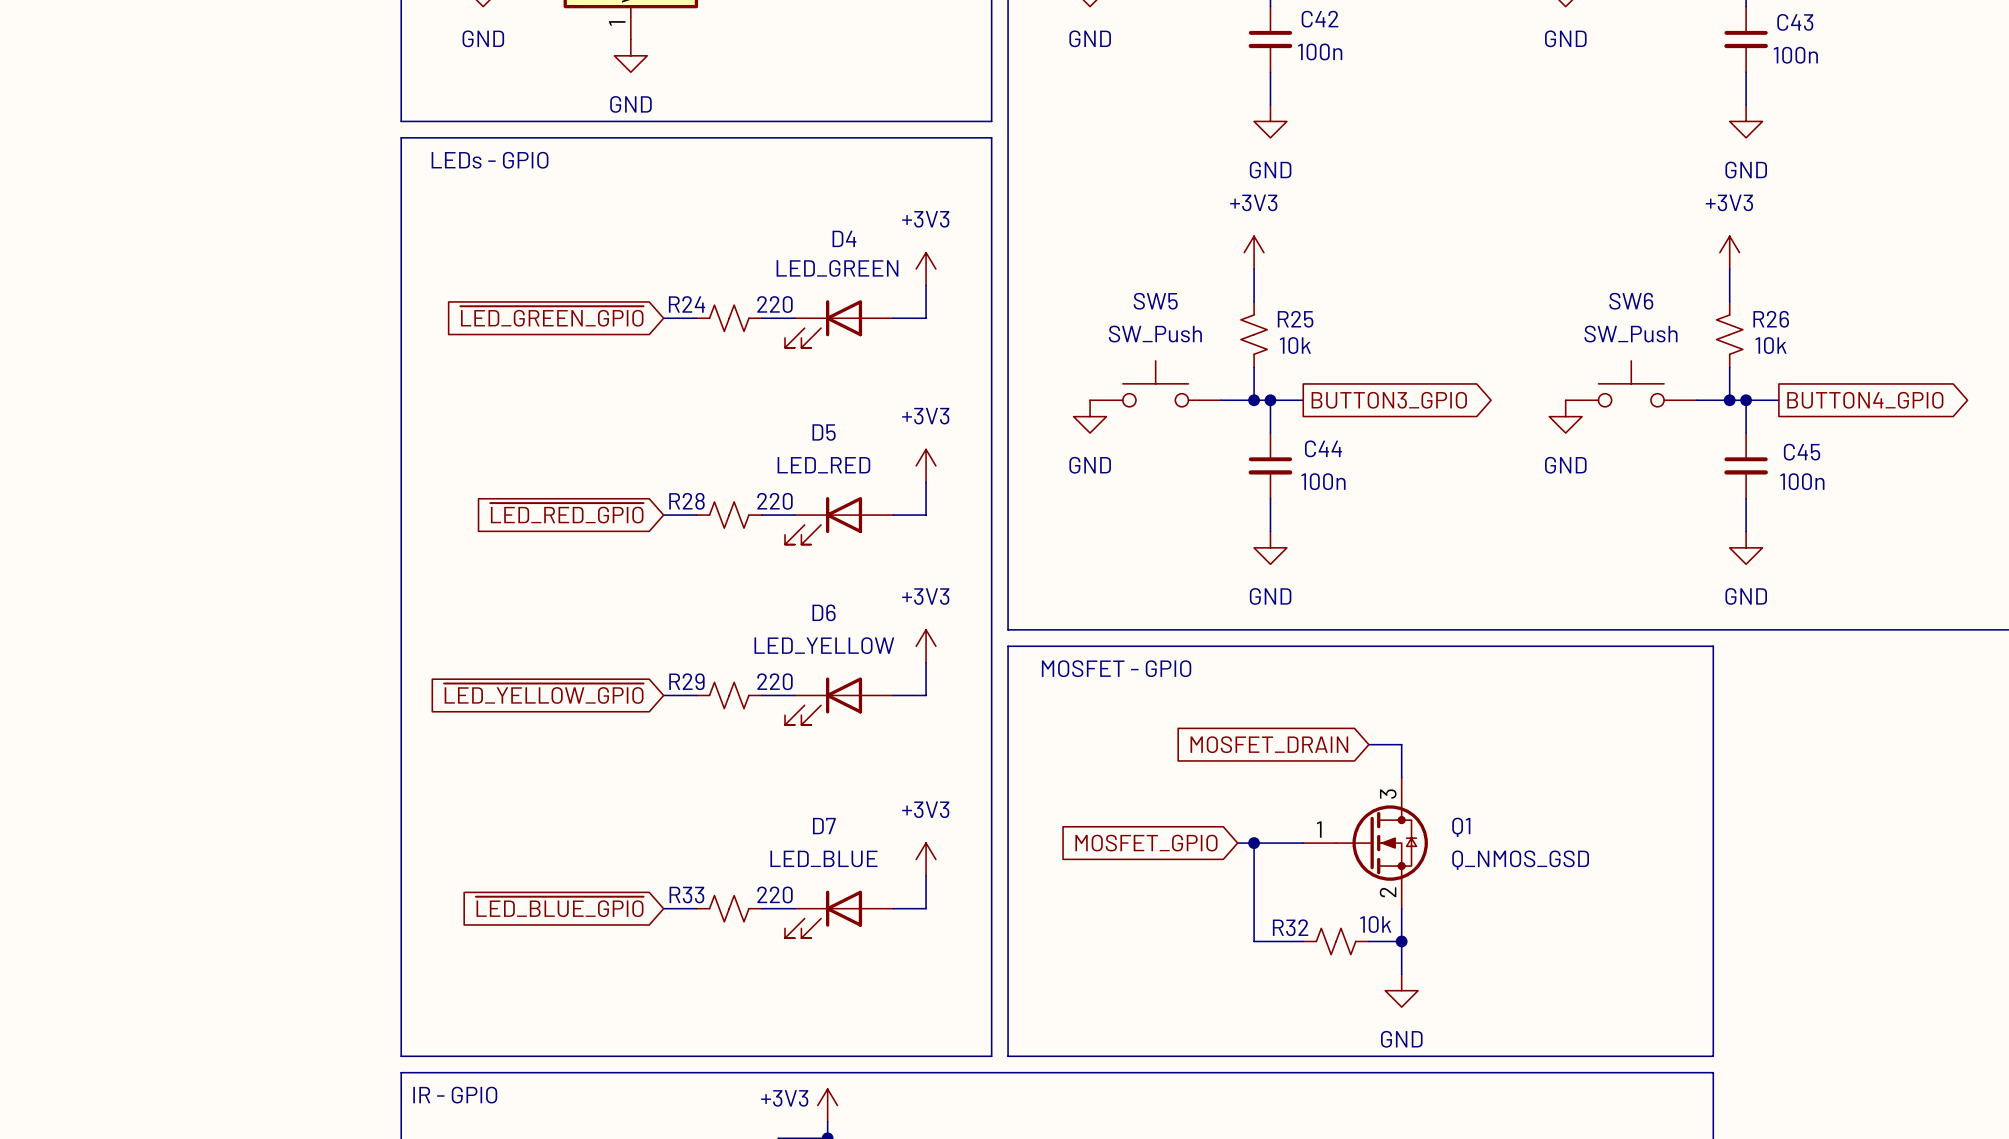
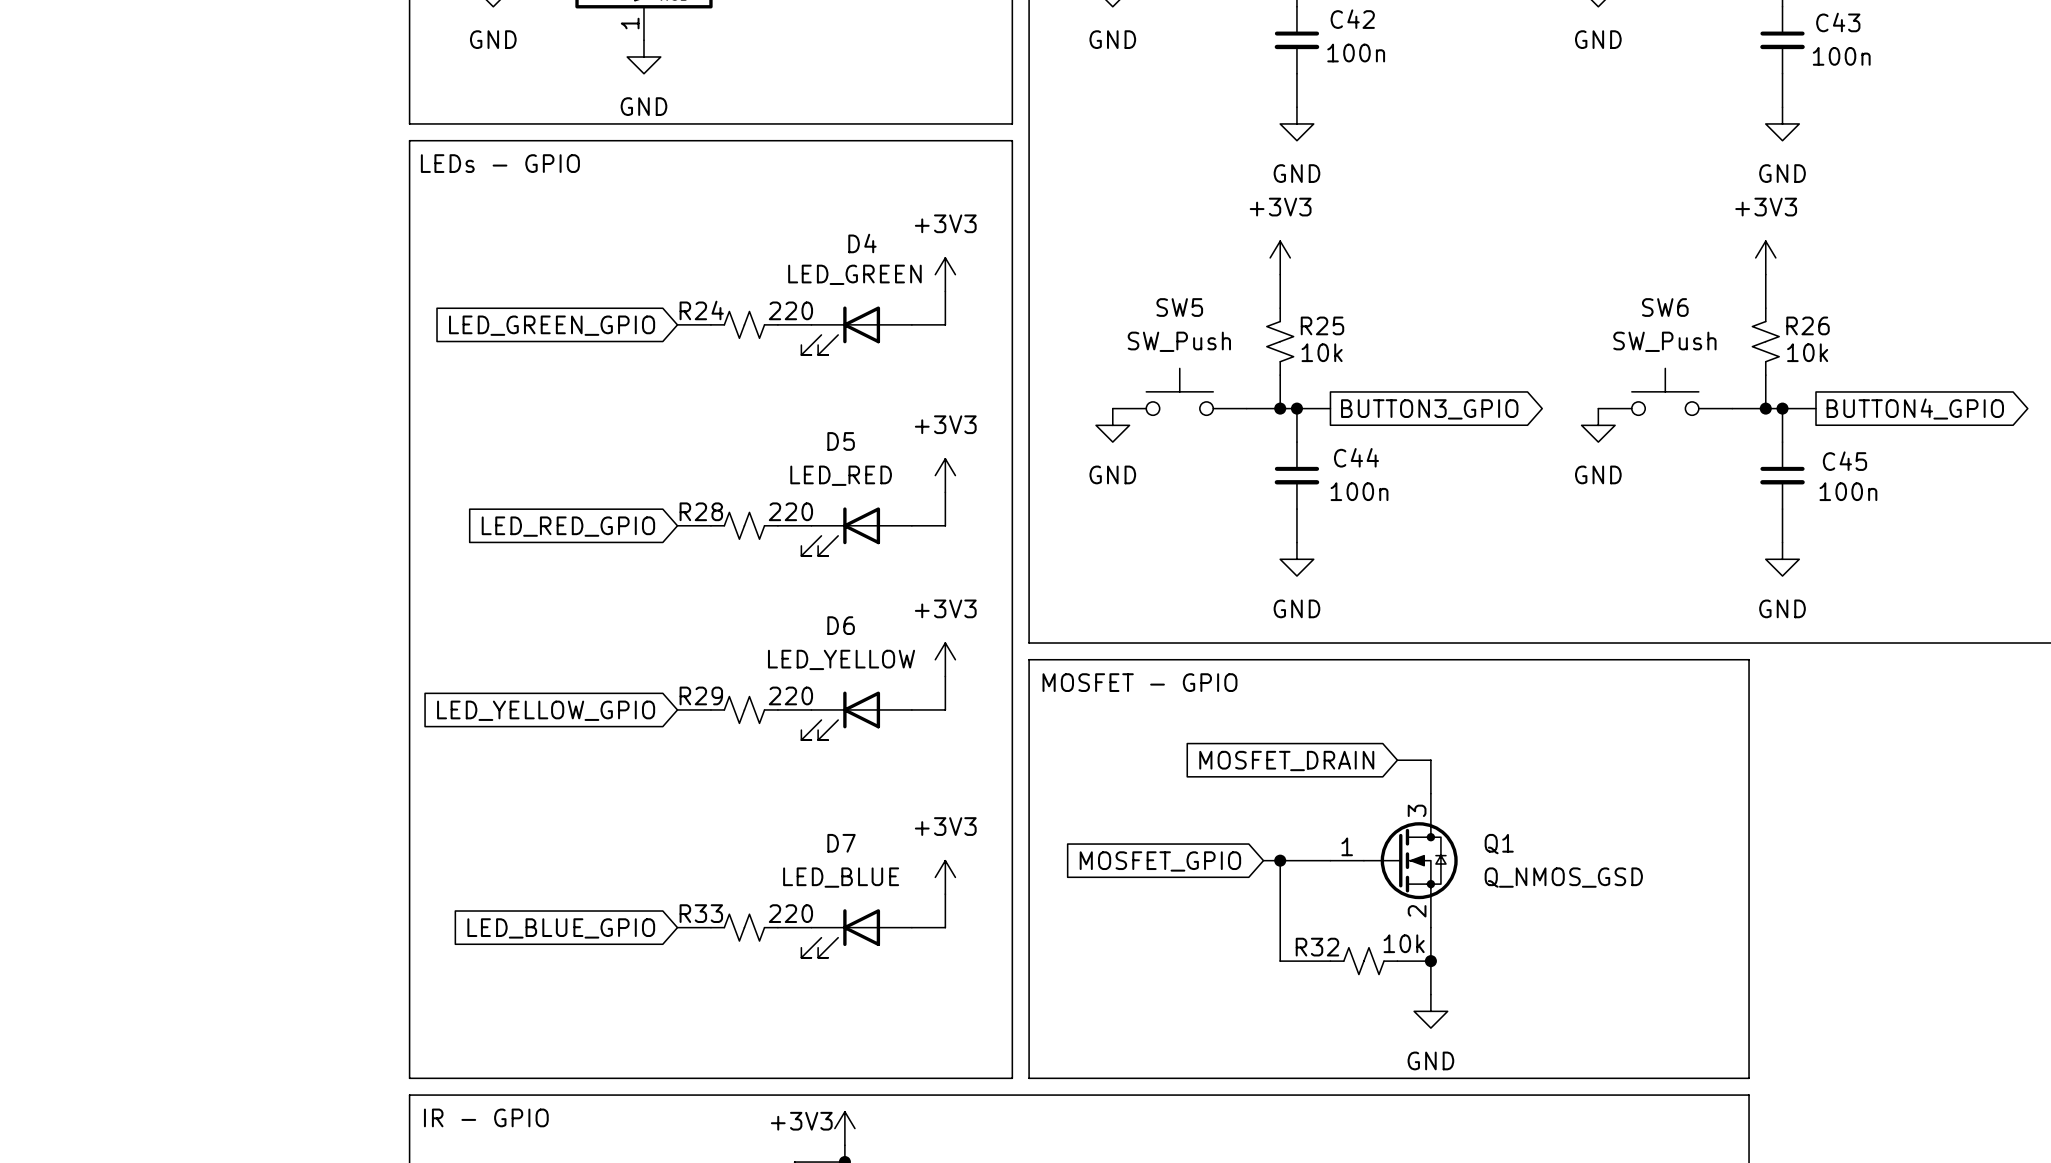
global label: ~{LED_GREEN_GPIO} (551, 316) -> LED_GREEN_GPIO (552, 325)
global label: ~{LED_RED_GPIO} (566, 513) -> LED_RED_GPIO (568, 526)
global label: ~{LED_YELLOW_GPIO} (543, 693) -> LED_YELLOW_GPIO (546, 710)
global label: ~{LED_BLUE_GPIO} (559, 906) -> LED_BLUE_GPIO (561, 928)

